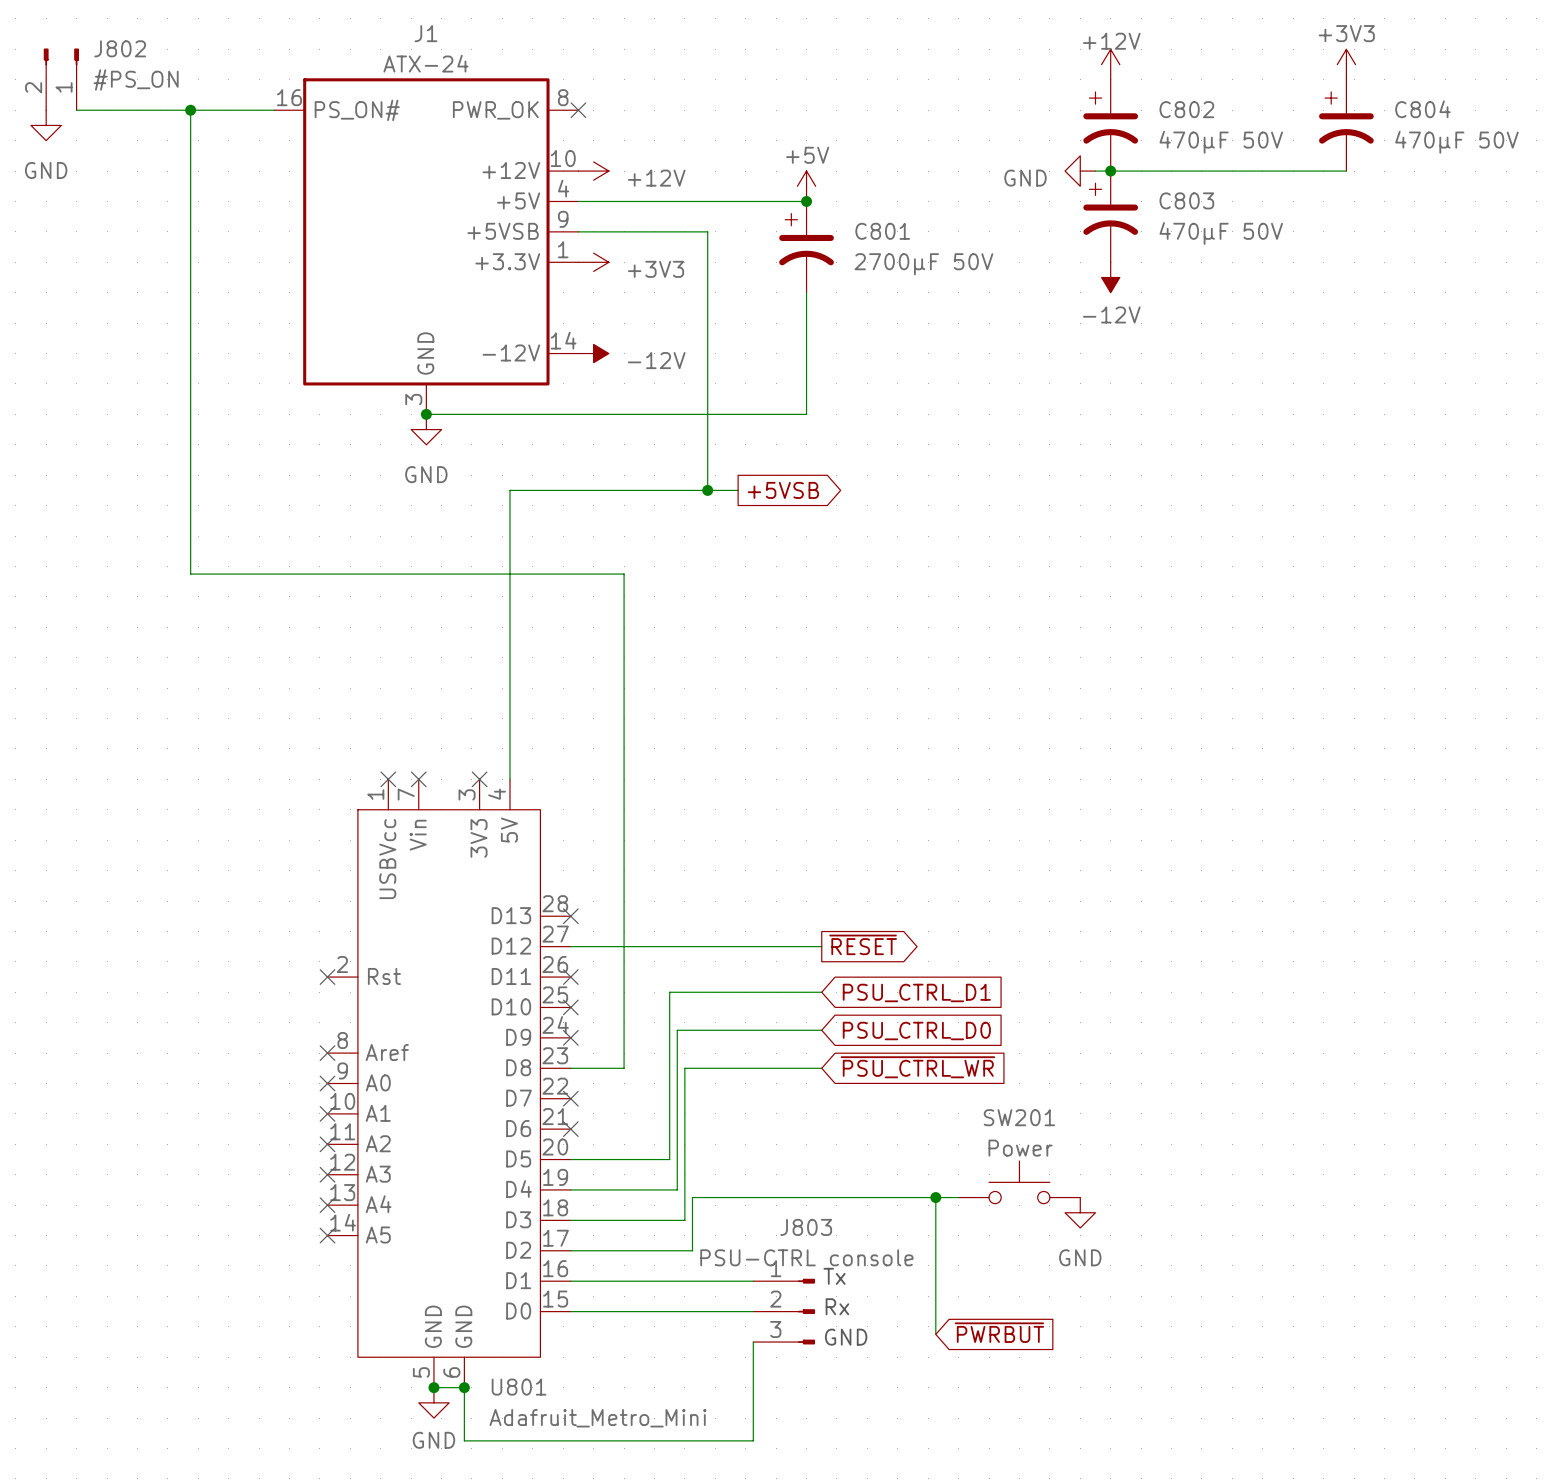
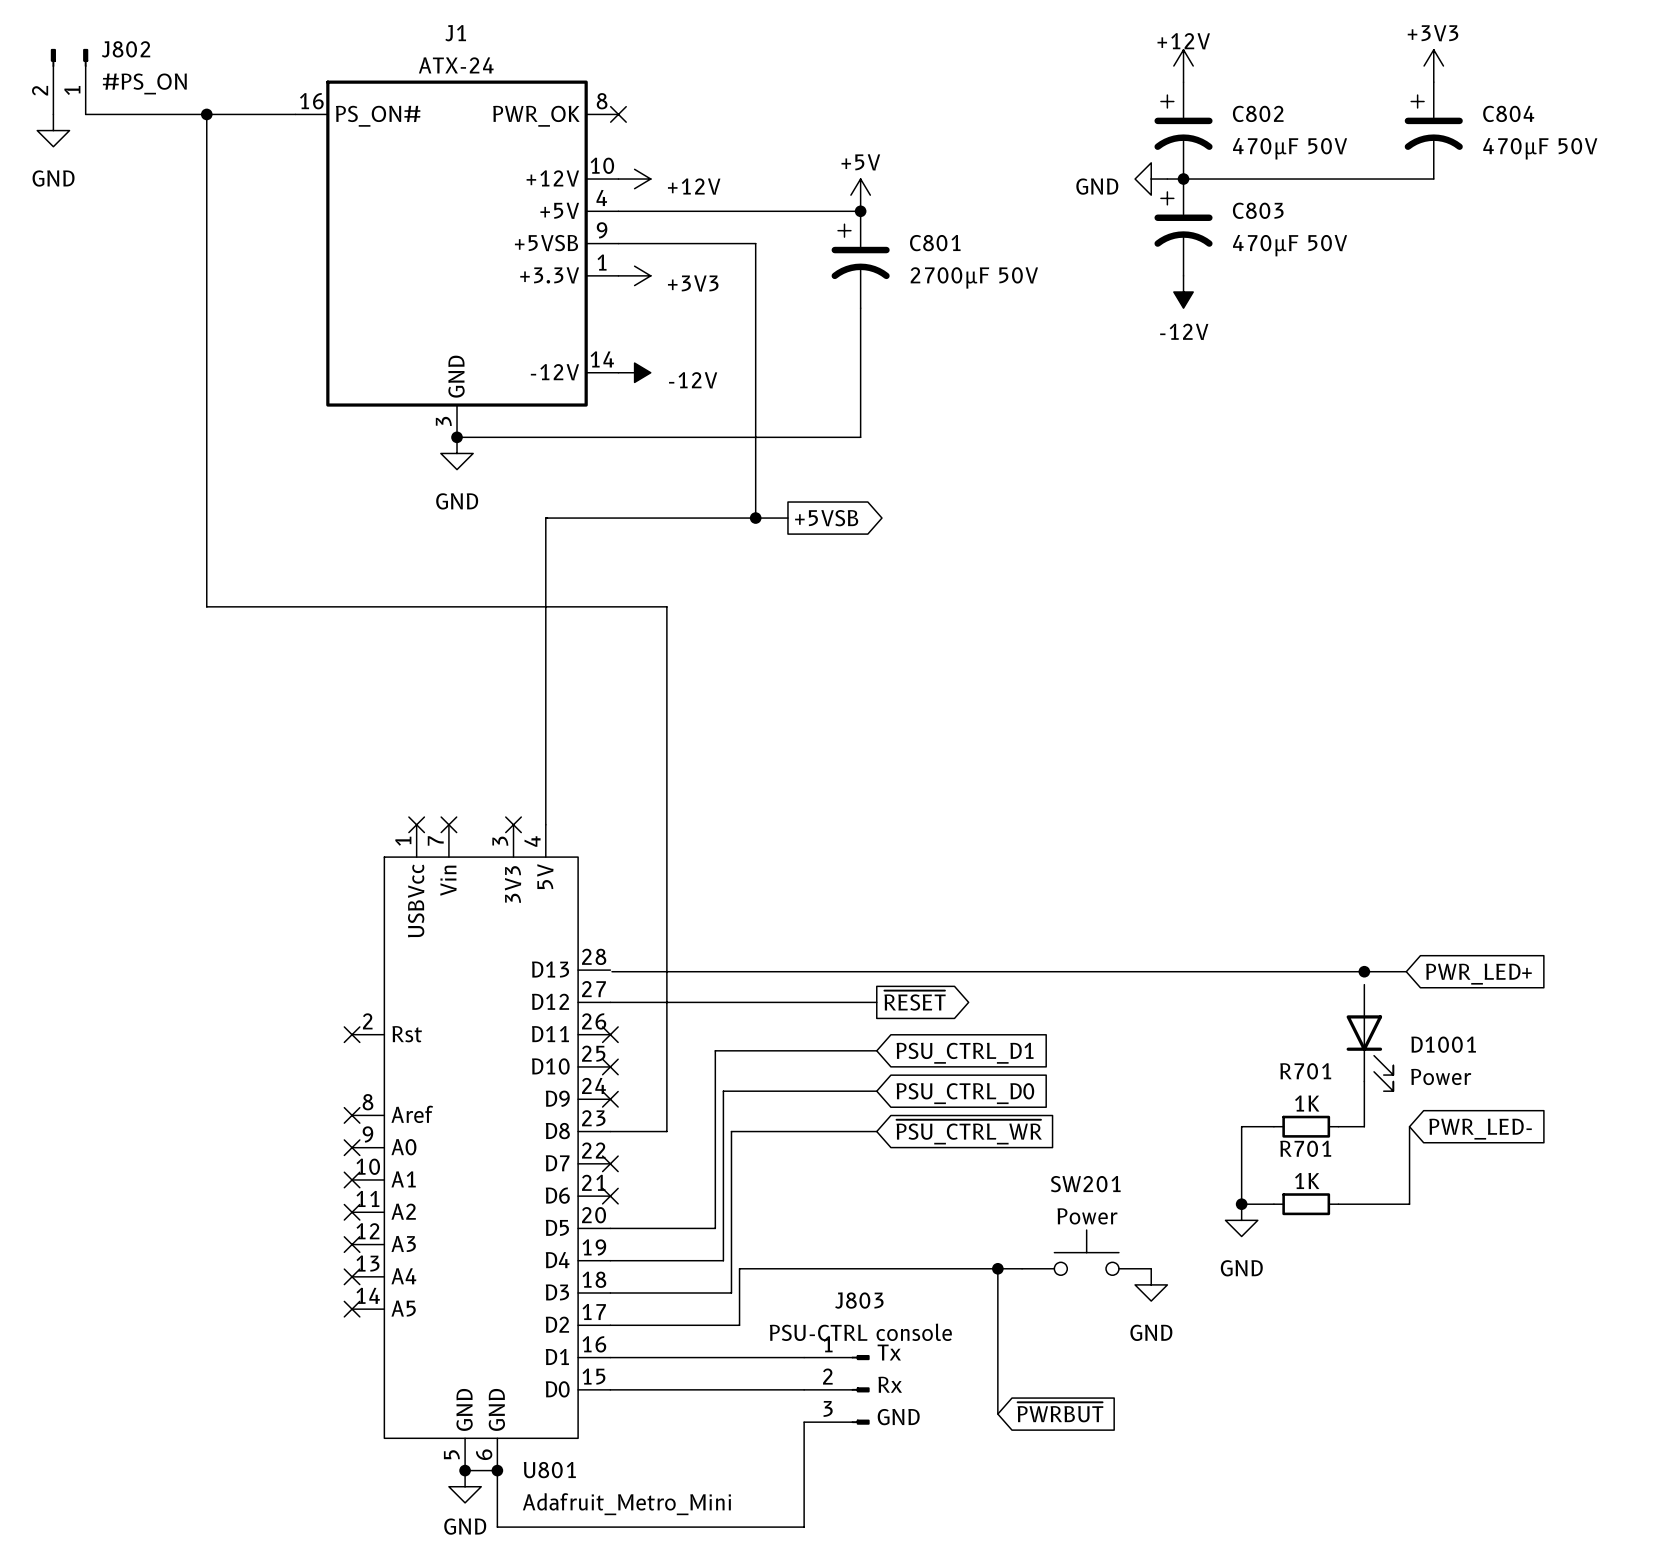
no-connect mark: (570, 916) -> none
wire: none -> (612, 971) (1406, 971)
junction: none -> (1364, 971)
global label: none -> PWR_LED+ (1478, 974)
D1001: none -> Power (1369, 1037)
wire: none -> (1364, 1081) (1364, 1126) (1338, 1126)
wire: none -> (1273, 1126) (1241, 1126) (1241, 1204) (1273, 1204)
R701: none -> 1K (1306, 1126)
wire: none -> (1409, 1126) (1409, 1204) (1338, 1204)
global label: none -> PWR_LED- (1480, 1129)
junction: none -> (1241, 1204)
R701: none -> 1K (1306, 1204)
power symbol: none -> GND (1241, 1220)

